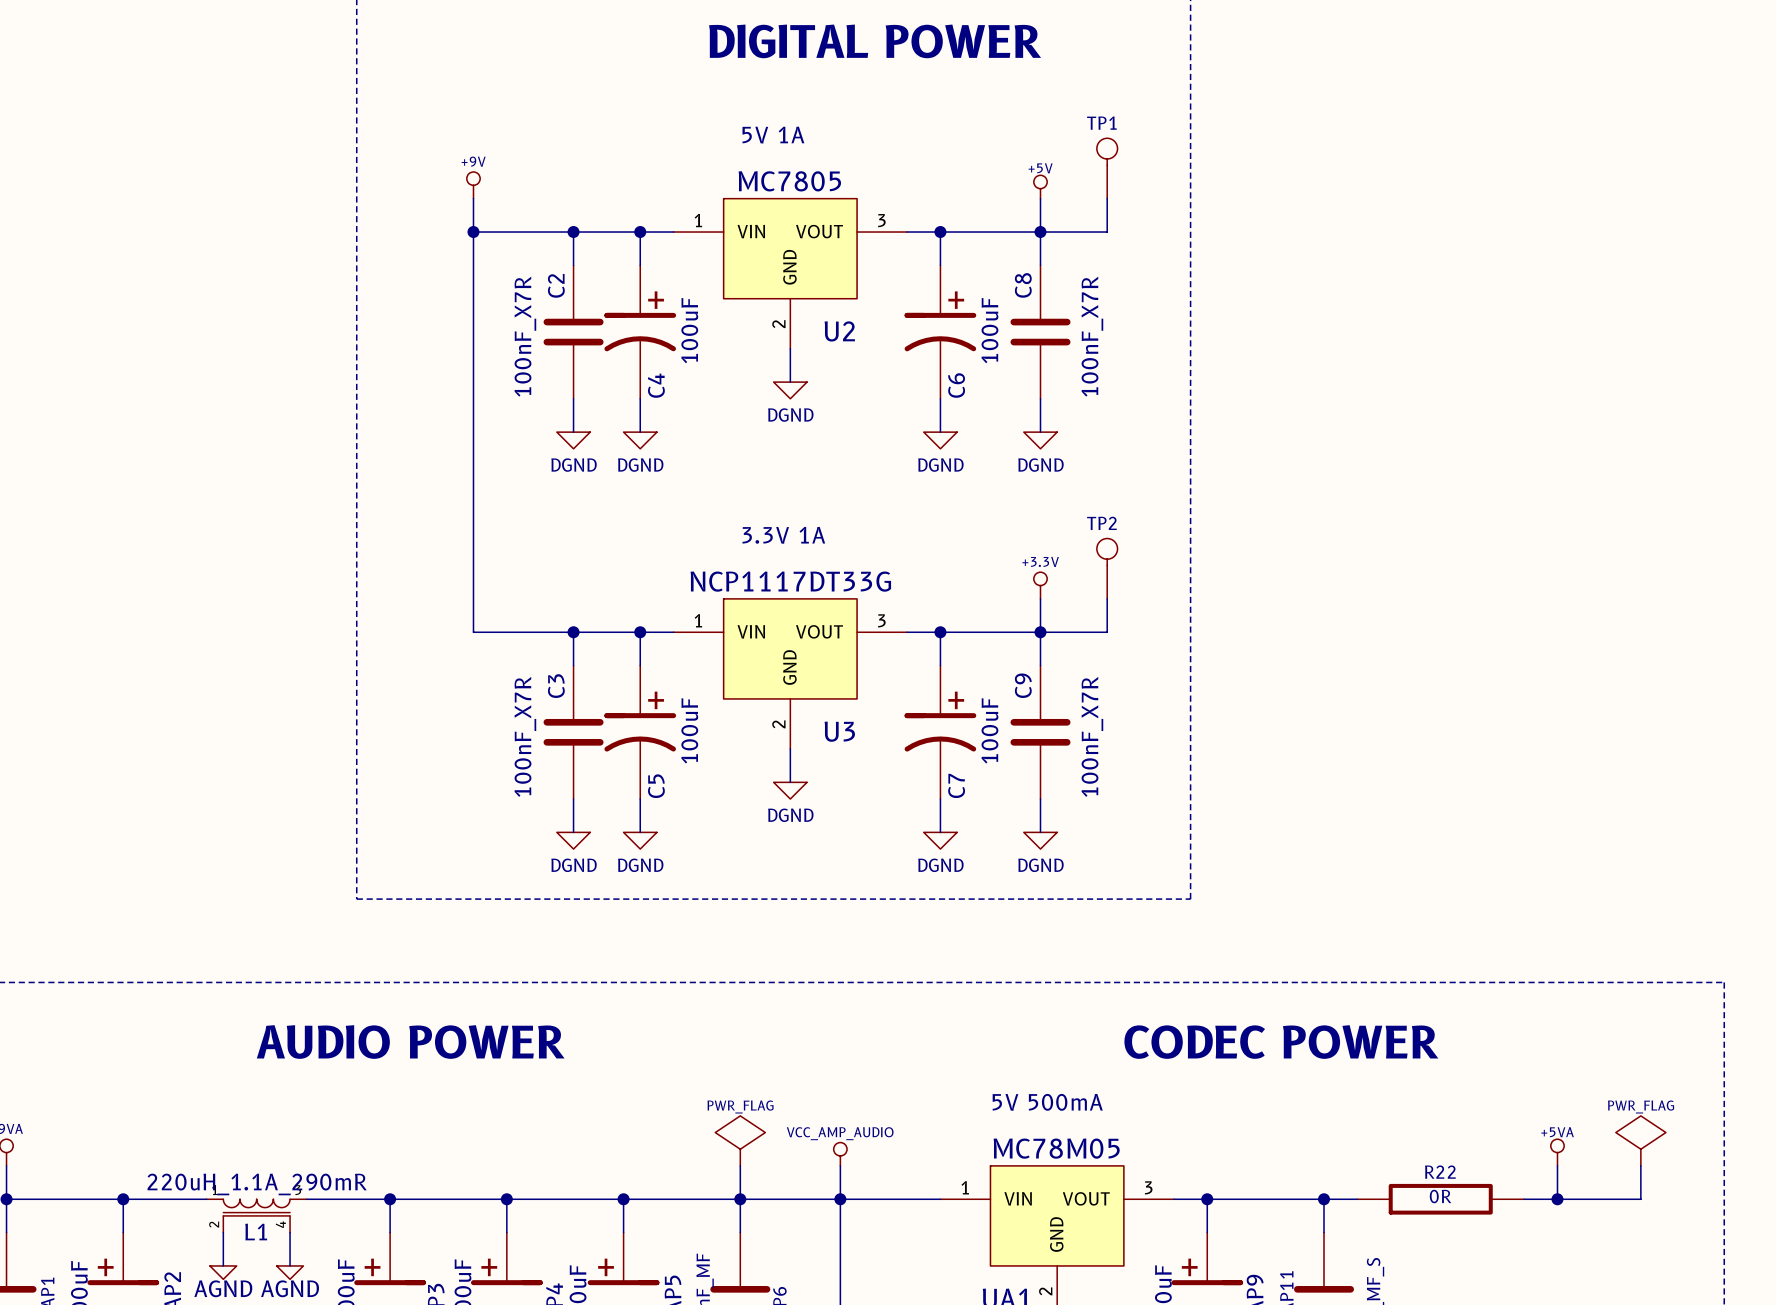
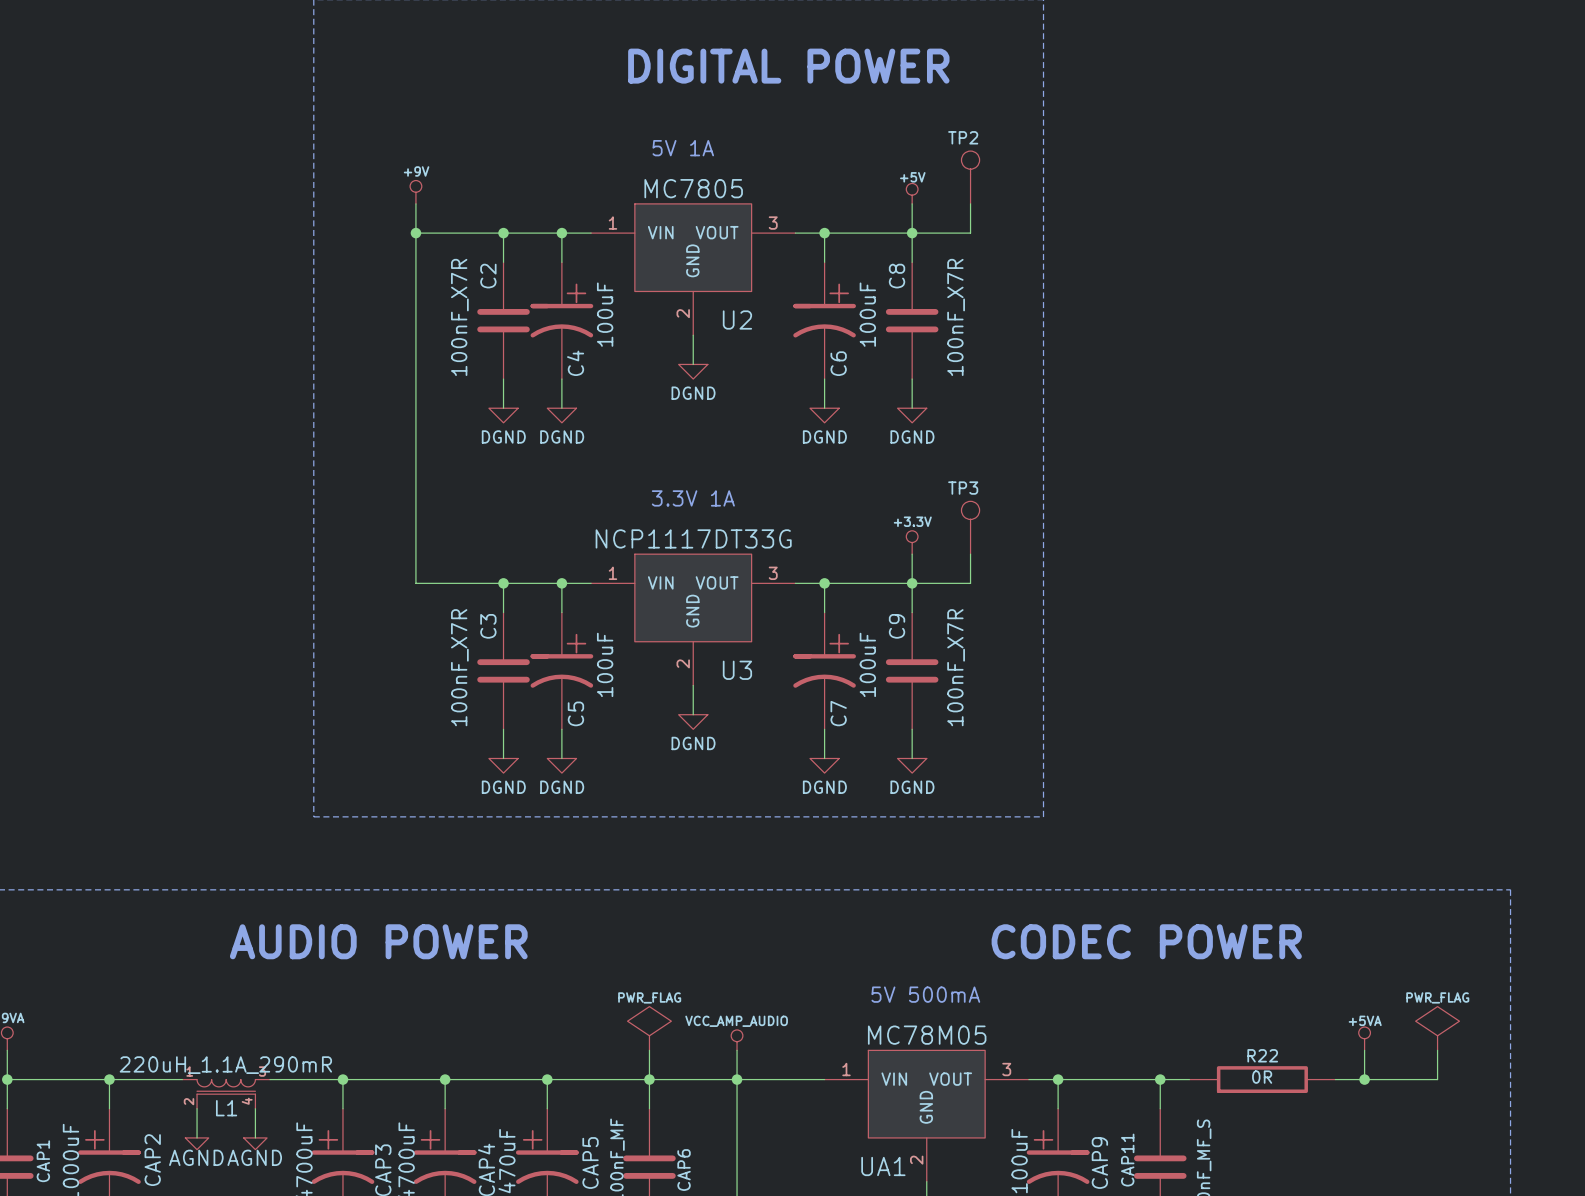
TP1 name: TP1 (1101, 123) -> TP2 (963, 137)
TP2 name: TP2 (1101, 523) -> TP3 (963, 488)

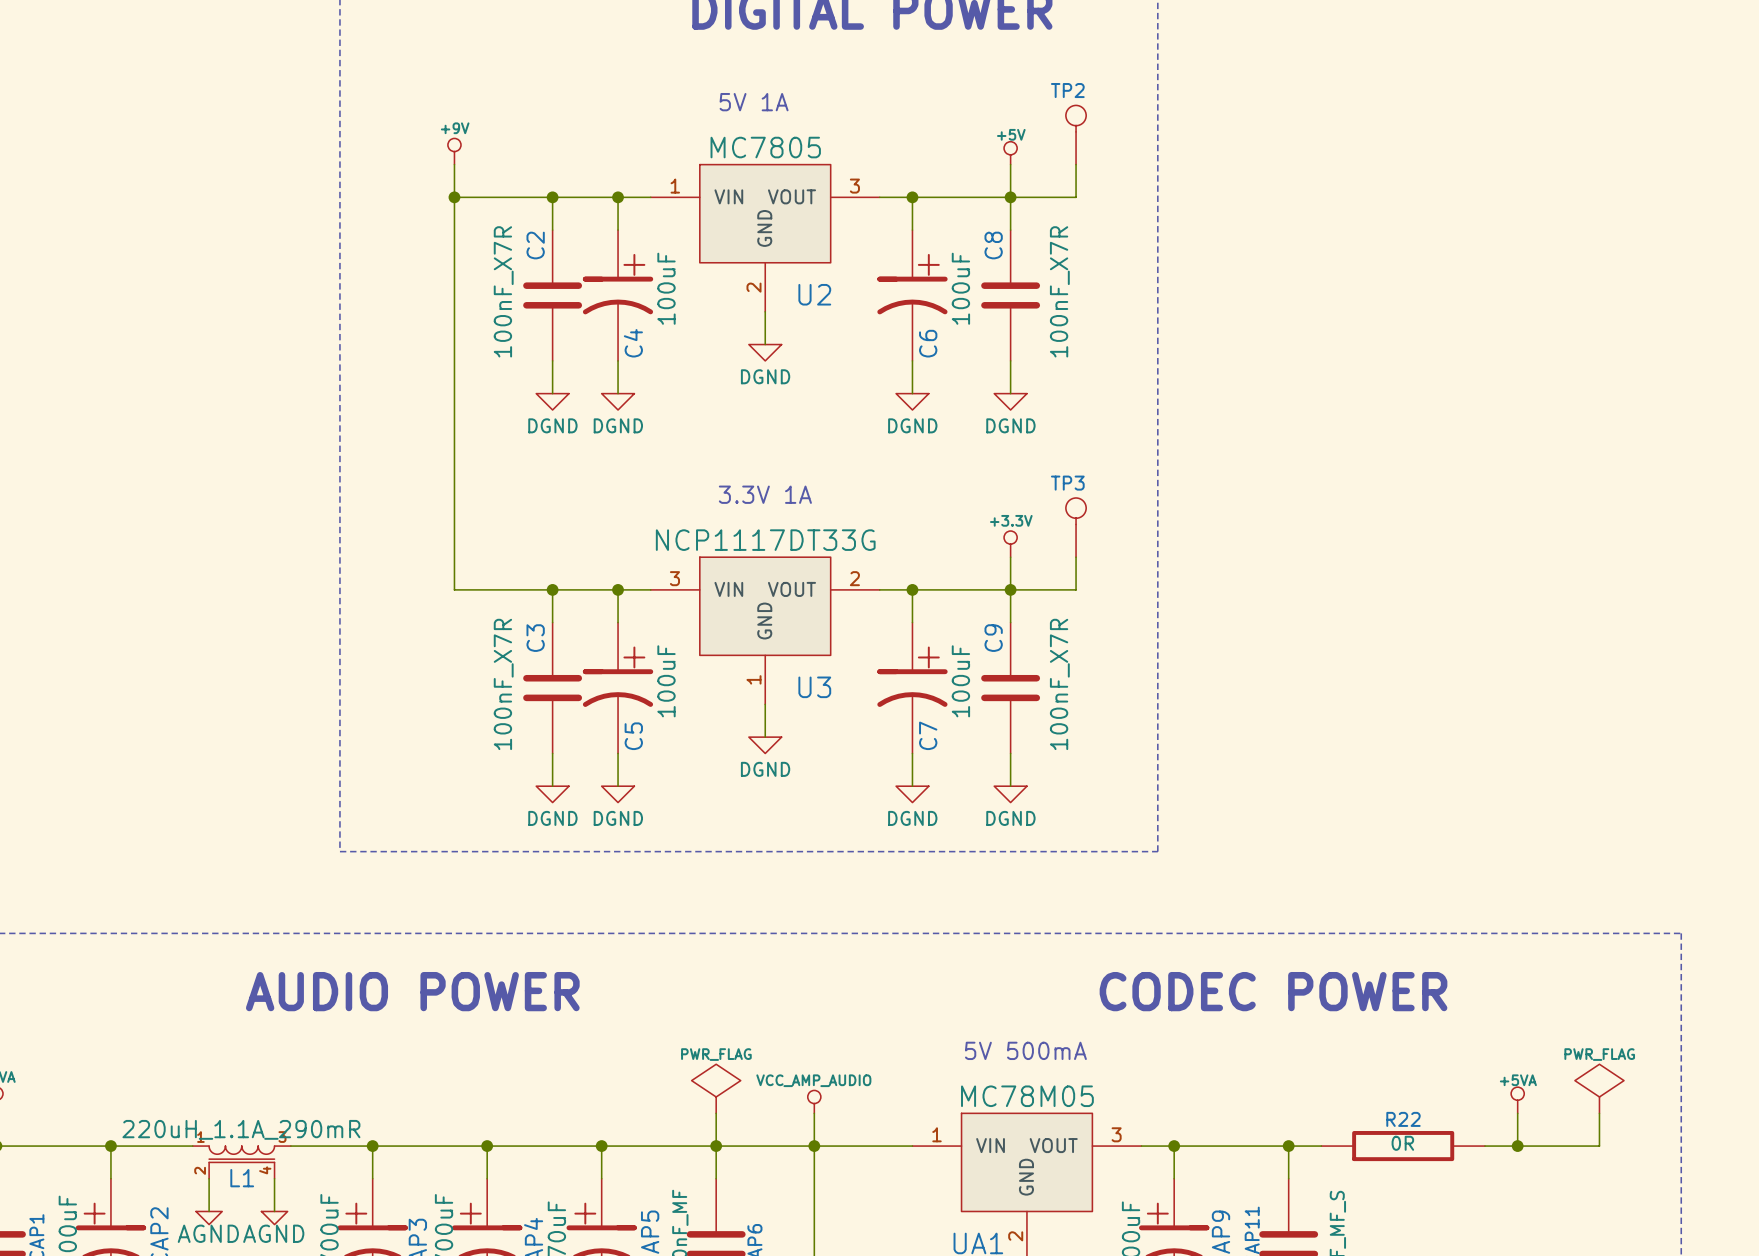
U3 pin number: 1 (612, 573) -> 3 (674, 578)
U3 pin number: 3 (773, 573) -> 2 (854, 578)
U3 pin number: 2 (683, 663) -> 1 (753, 679)

